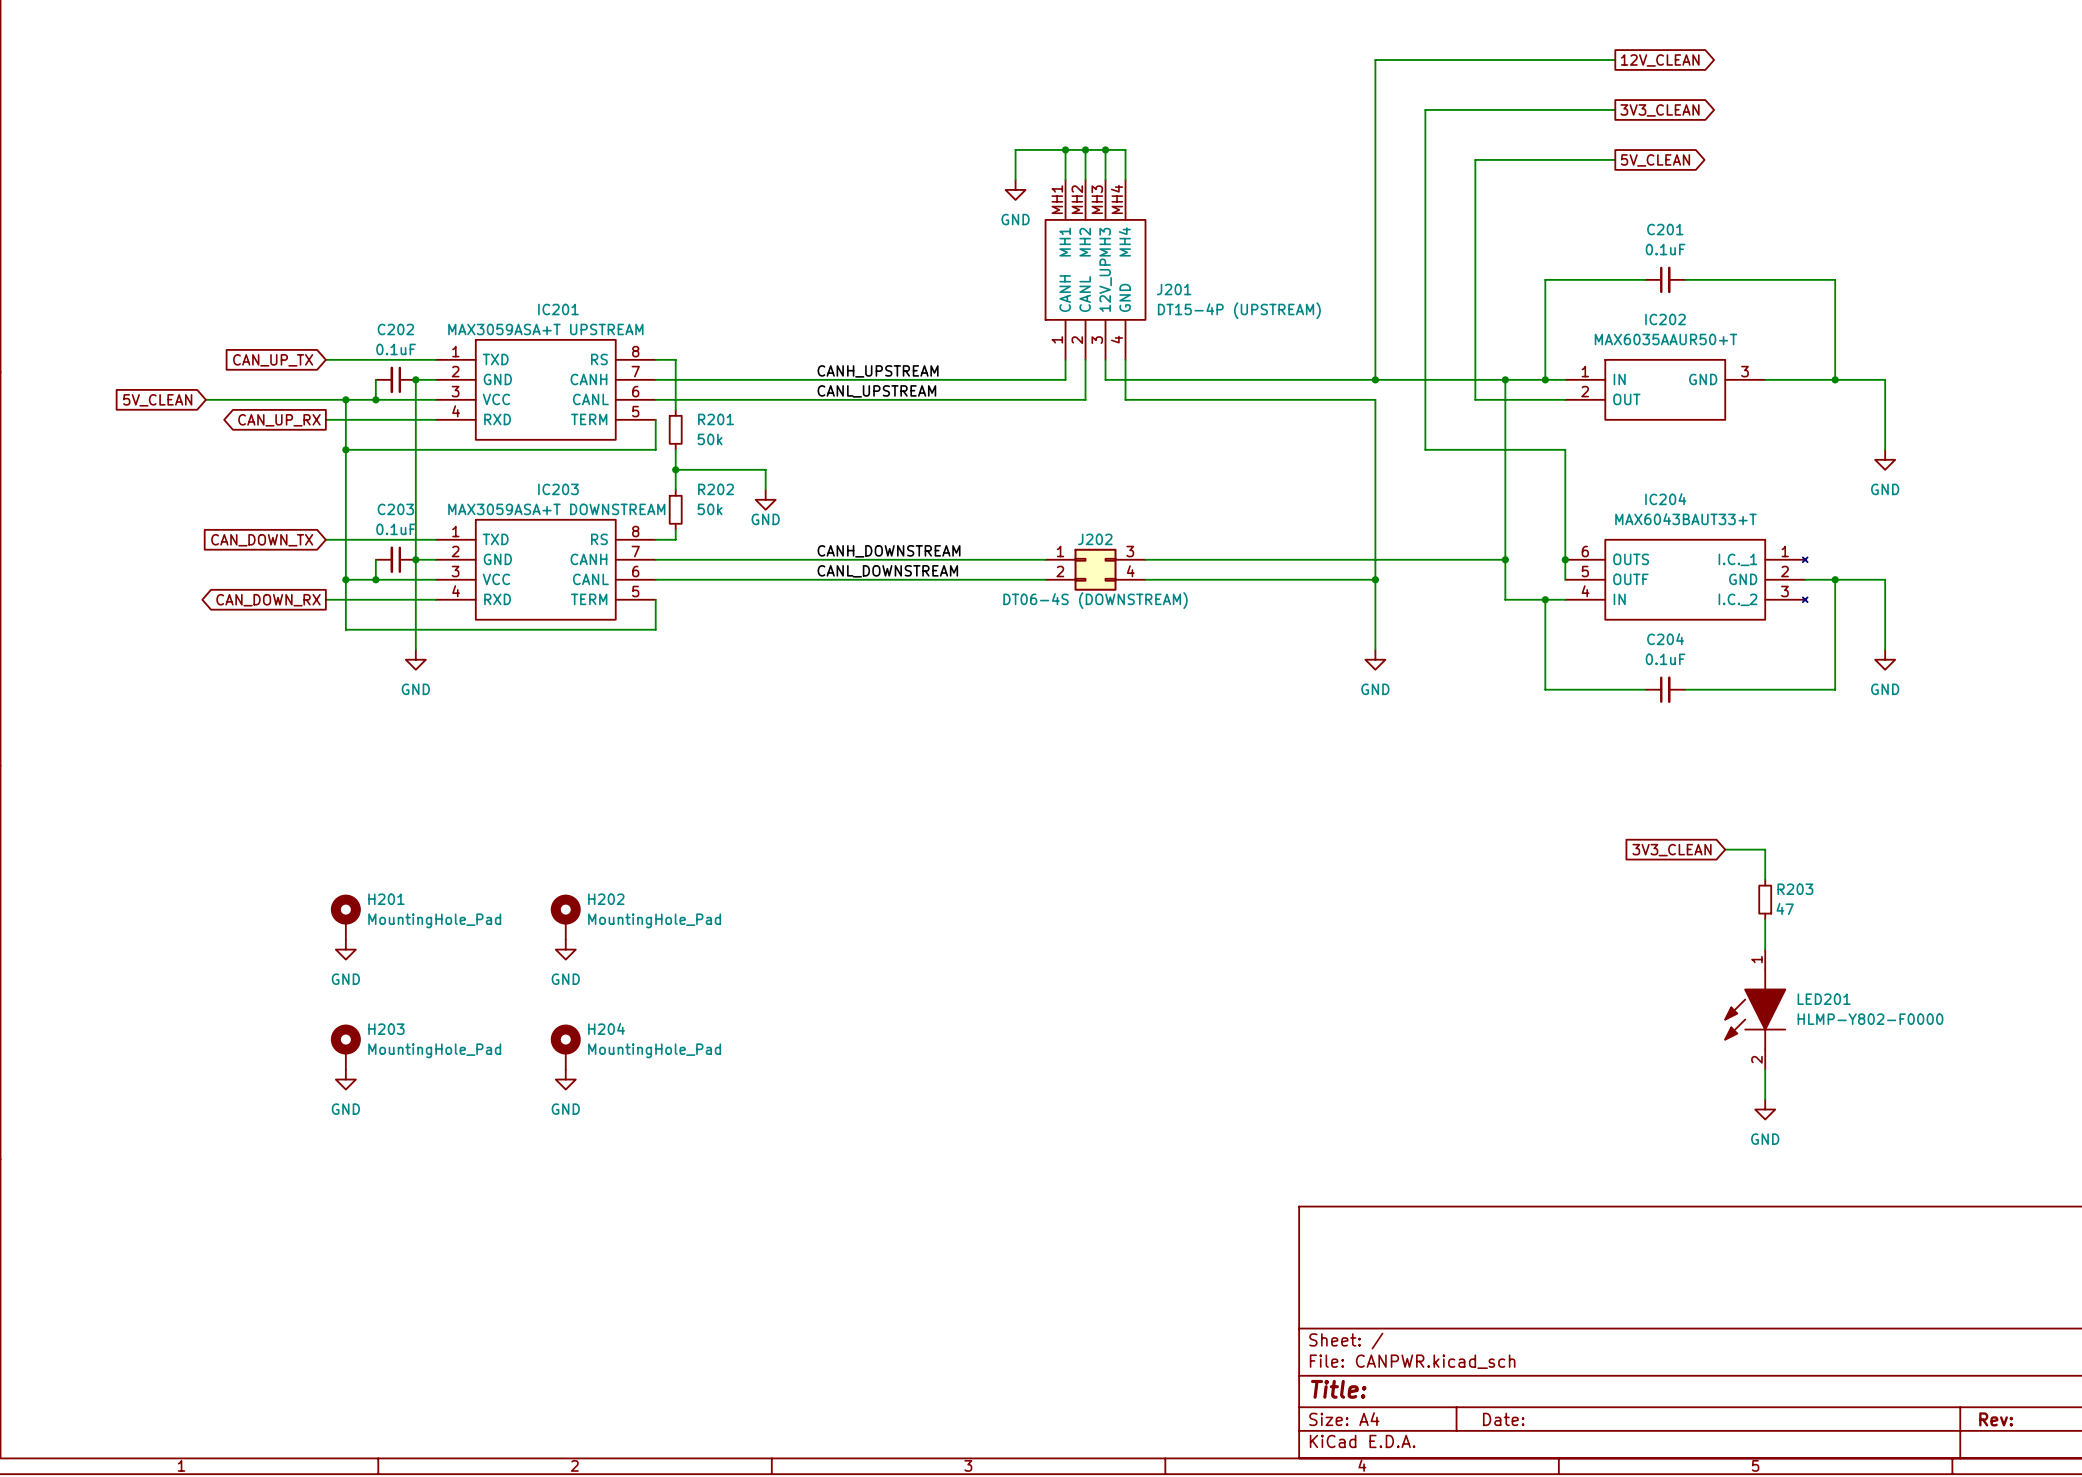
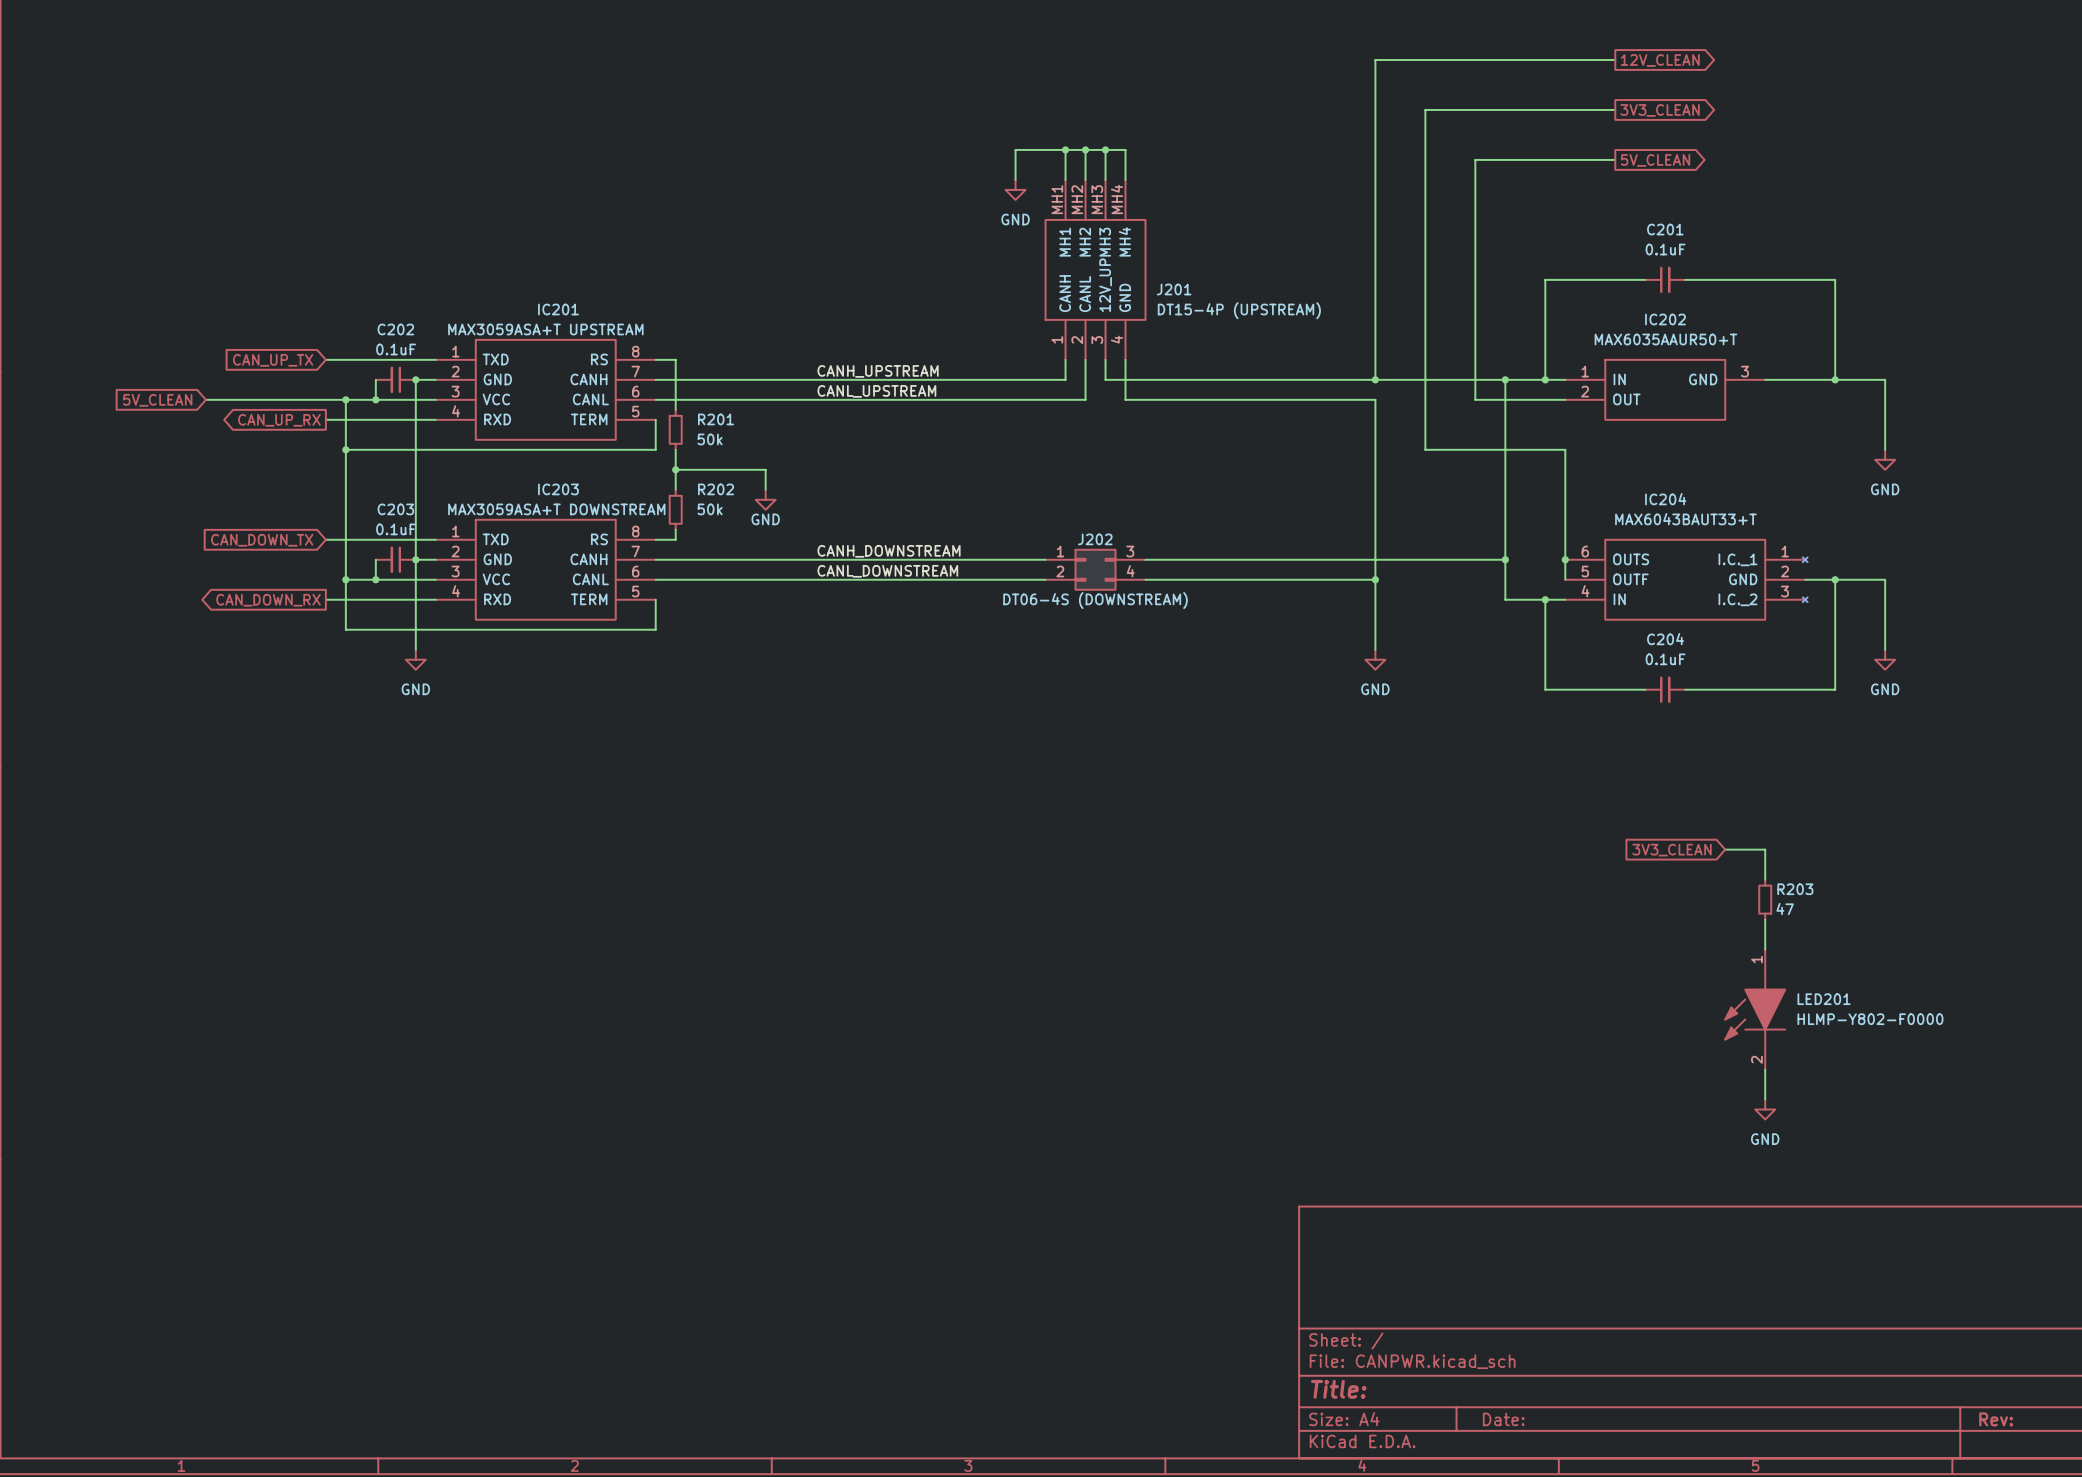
H201: MountingHole_Pad (345, 917) -> none
H202: MountingHole_Pad (565, 917) -> none
power symbol: GND (345, 949) -> none
power symbol: GND (565, 949) -> none
H203: MountingHole_Pad (345, 1047) -> none
H204: MountingHole_Pad (565, 1047) -> none
power symbol: GND (345, 1079) -> none
power symbol: GND (565, 1079) -> none

